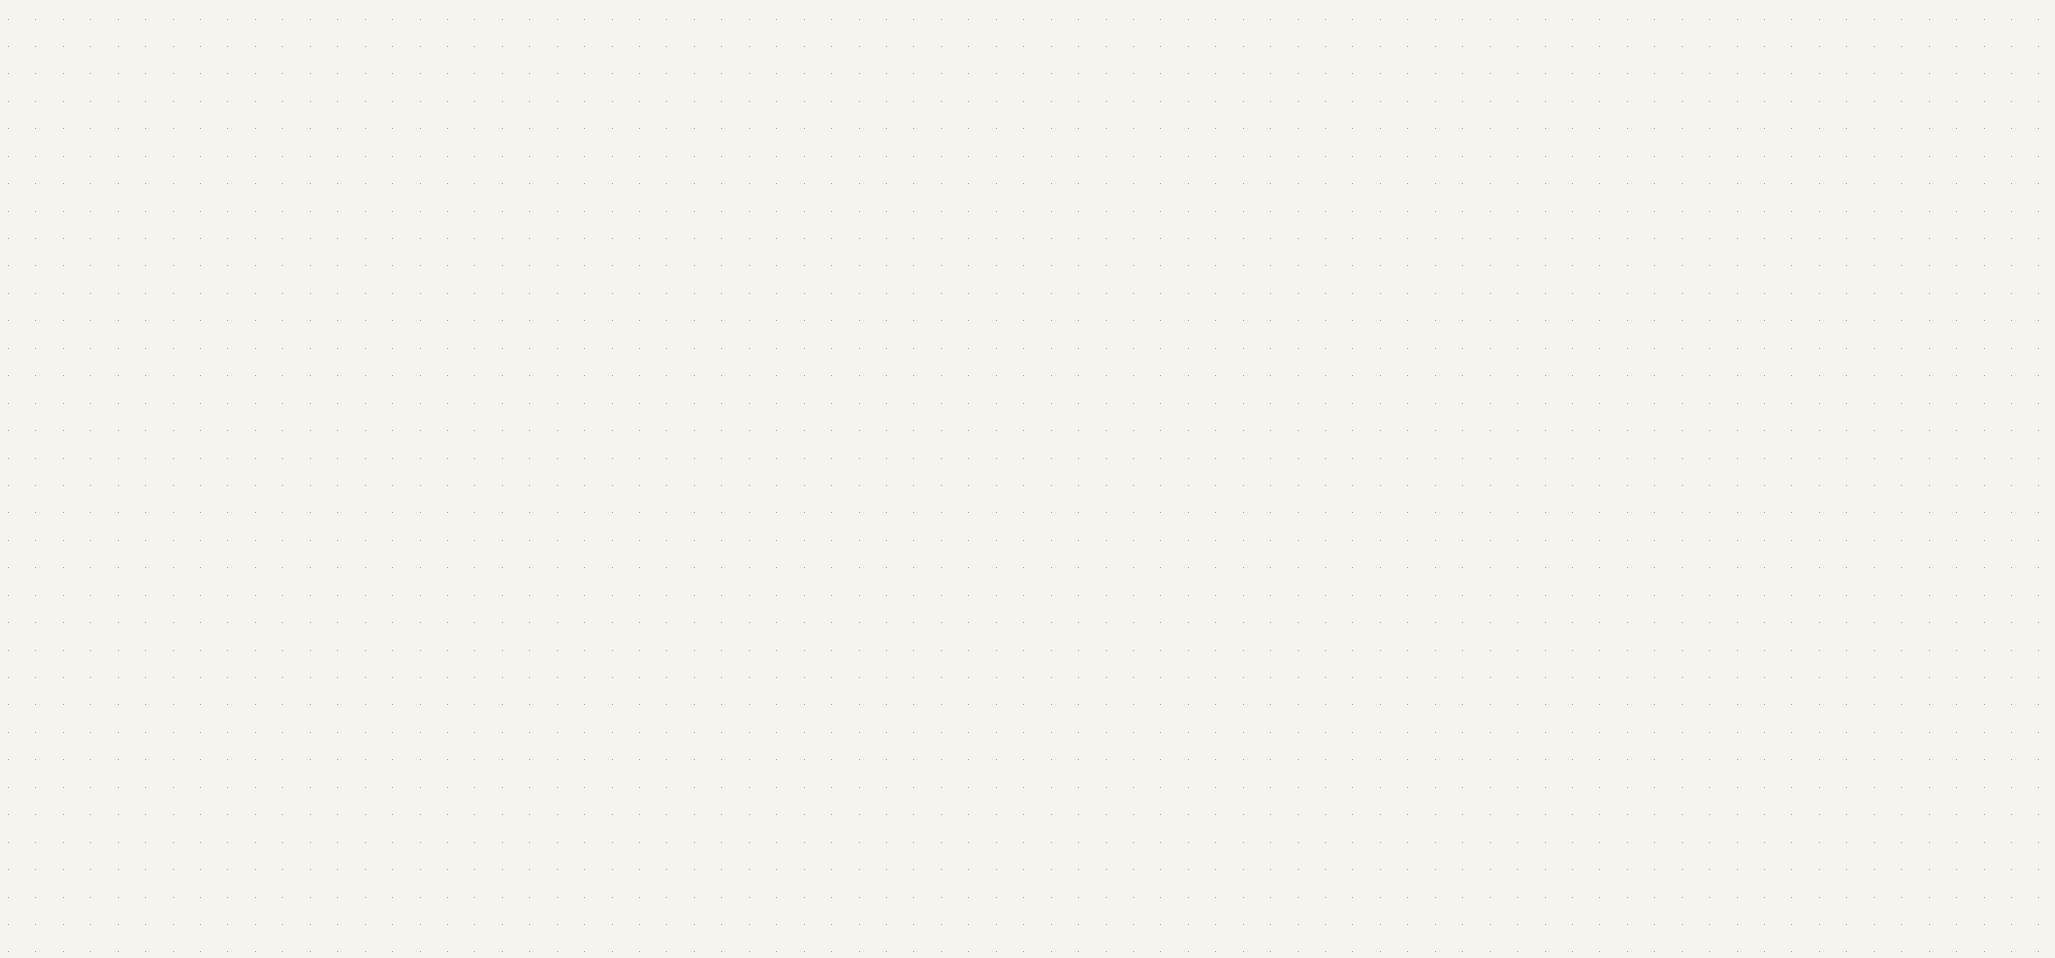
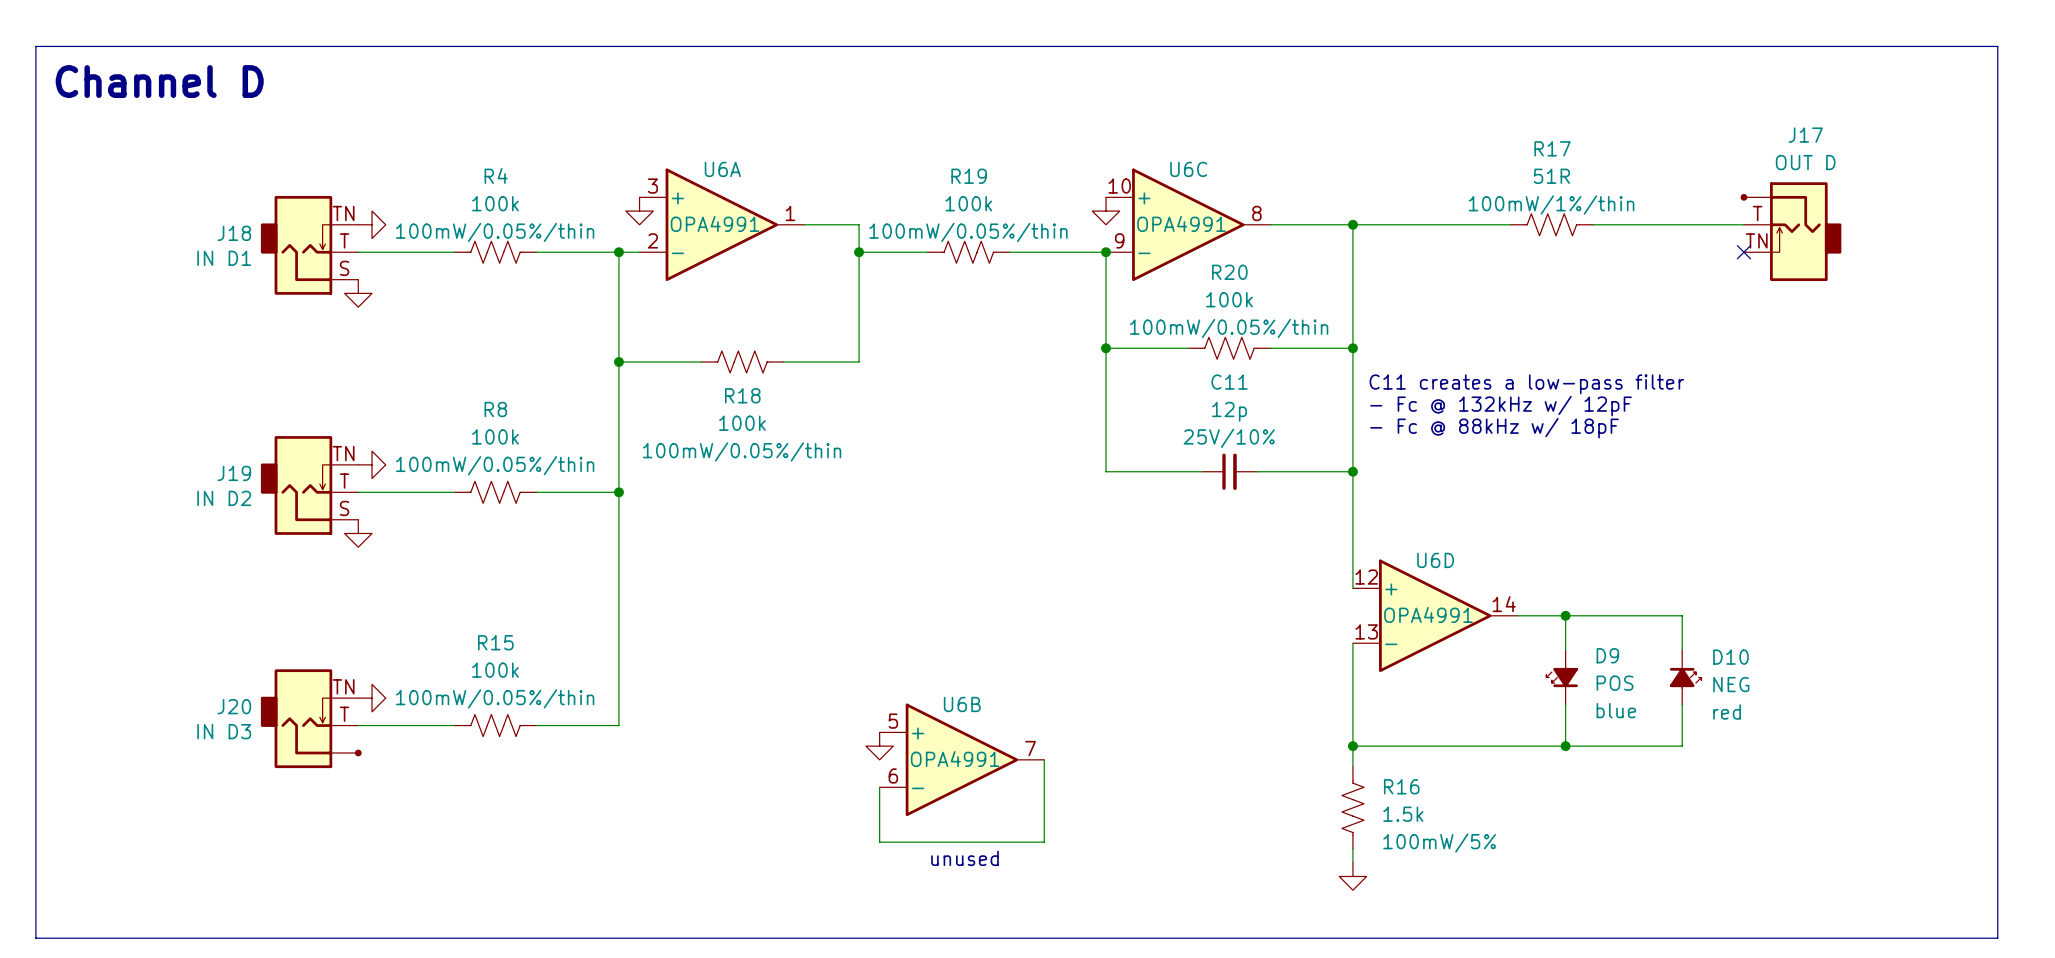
line: none -> (35, 46) (1997, 46) (1997, 938) (35, 938) (35, 46)
text: none -> Channel D (159, 81)
power symbol: none -> (639, 211)
power symbol: none -> (1106, 211)
power symbol: none -> (372, 224)
U6A: none -> OPA4991 (721, 224)
wire: none -> (804, 224) (859, 224) (859, 361) (783, 361)
U6C: none -> OPA4991 (1188, 224)
wire: none -> (1270, 224) (1510, 224)
wire: none -> (1352, 224) (1352, 588)
junction: none -> (1352, 224)
R17: none -> 51R (1551, 224)
wire: none -> (1593, 224) (1743, 224)
J17: none -> OUT D (1791, 231)
J18: none -> IN D1 (309, 245)
wire: none -> (358, 252) (454, 252)
R4: none -> 100k (495, 252)
wire: none -> (536, 252) (639, 252)
wire: none -> (618, 252) (618, 725) (536, 725)
junction: none -> (618, 252)
wire: none -> (859, 252) (927, 252)
junction: none -> (859, 252)
R19: none -> 100k (968, 252)
wire: none -> (1009, 252) (1106, 252) (1106, 471) (1202, 471)
junction: none -> (1106, 252)
no-connect mark: none -> (1743, 252)
power symbol: none -> (358, 293)
wire: none -> (1106, 348) (1188, 348)
junction: none -> (1106, 348)
R20: none -> 100k (1229, 348)
wire: none -> (1270, 348) (1352, 348)
junction: none -> (1352, 348)
wire: none -> (618, 361) (701, 361)
junction: none -> (618, 361)
R18: none -> 100k (742, 361)
text: none -> C11 creates a low-pass filter (1526, 384)
text: none -> - Fc @ 132kHz w/ 12pF (1501, 406)
text: none -> - Fc @ 88kHz w/ 18pF (1494, 428)
power symbol: none -> (372, 464)
C11: none -> 12p (1229, 471)
wire: none -> (1256, 471) (1352, 471)
junction: none -> (1352, 471)
J19: none -> IN D2 (309, 485)
wire: none -> (358, 492) (454, 492)
R8: none -> 100k (495, 492)
wire: none -> (536, 492) (618, 492)
junction: none -> (618, 492)
power symbol: none -> (358, 533)
U6D: none -> OPA4991 (1435, 615)
wire: none -> (1517, 615) (1682, 615) (1682, 650)
wire: none -> (1565, 615) (1565, 650)
junction: none -> (1565, 615)
wire: none -> (1352, 643) (1352, 766)
D9: none -> POS (1562, 677)
D10: none -> NEG (1685, 677)
power symbol: none -> (372, 698)
wire: none -> (1565, 704) (1565, 746)
wire: none -> (1682, 704) (1682, 746) (1352, 746)
J20: none -> IN D3 (310, 718)
wire: none -> (358, 725) (454, 725)
R15: none -> 100k (495, 725)
power symbol: none -> (879, 746)
junction: none -> (1352, 746)
junction: none -> (1565, 746)
U6B: none -> OPA4991 (961, 759)
wire: none -> (1044, 759) (1044, 842) (879, 842) (879, 787)
R16: none -> 1.5k (1352, 807)
wire: none -> (1352, 849) (1352, 862)
text: none -> unused (964, 858)
power symbol: none -> (1352, 876)

